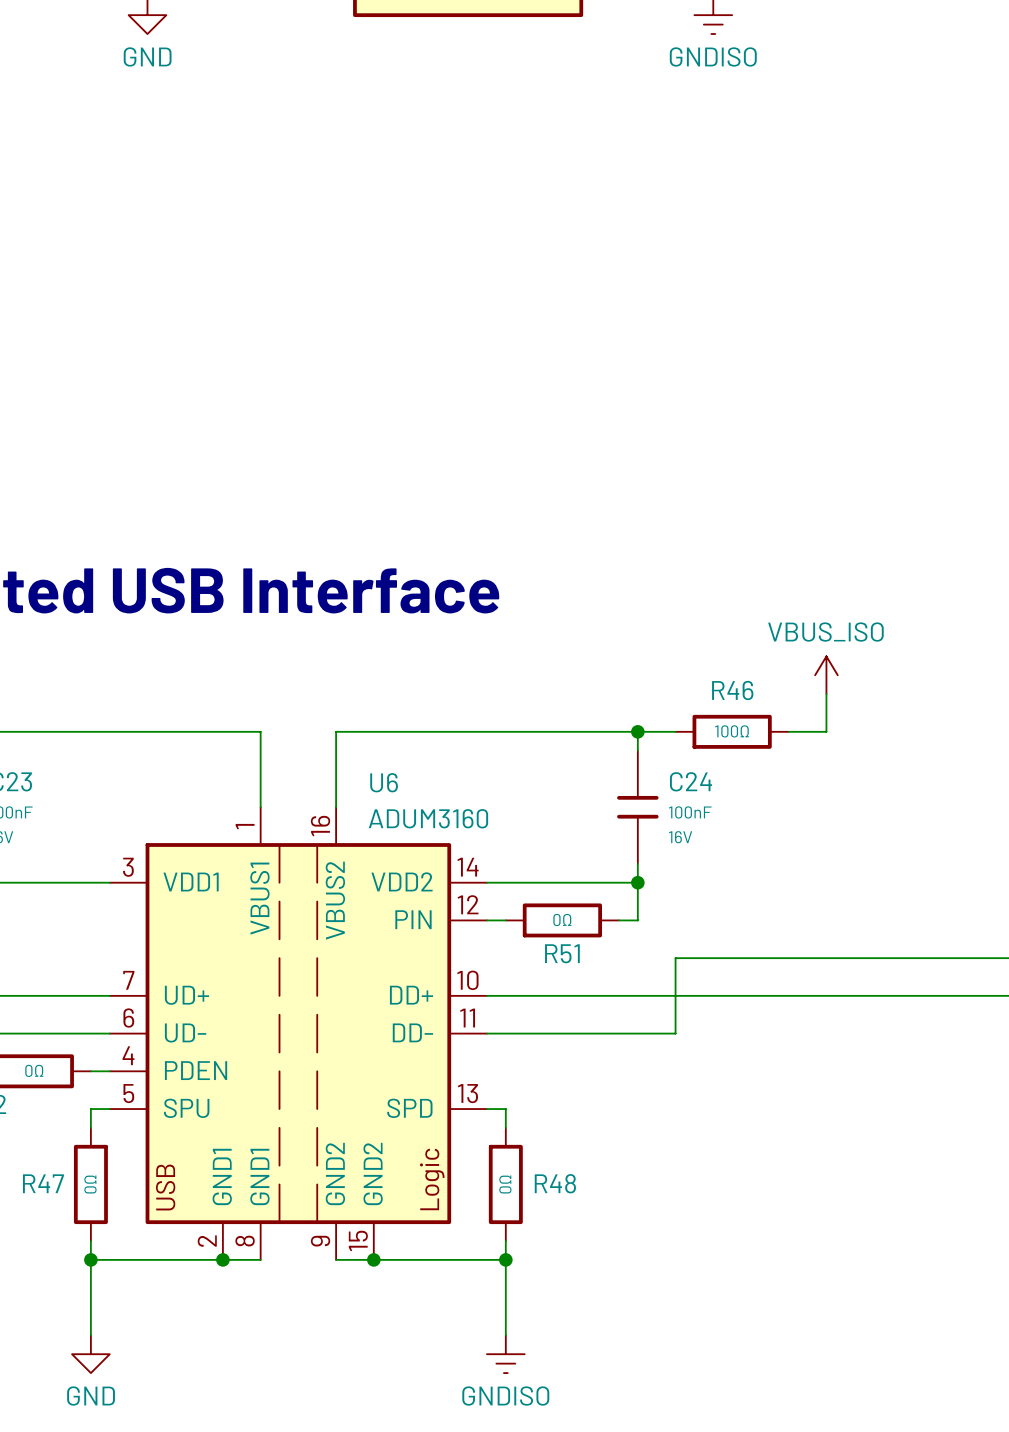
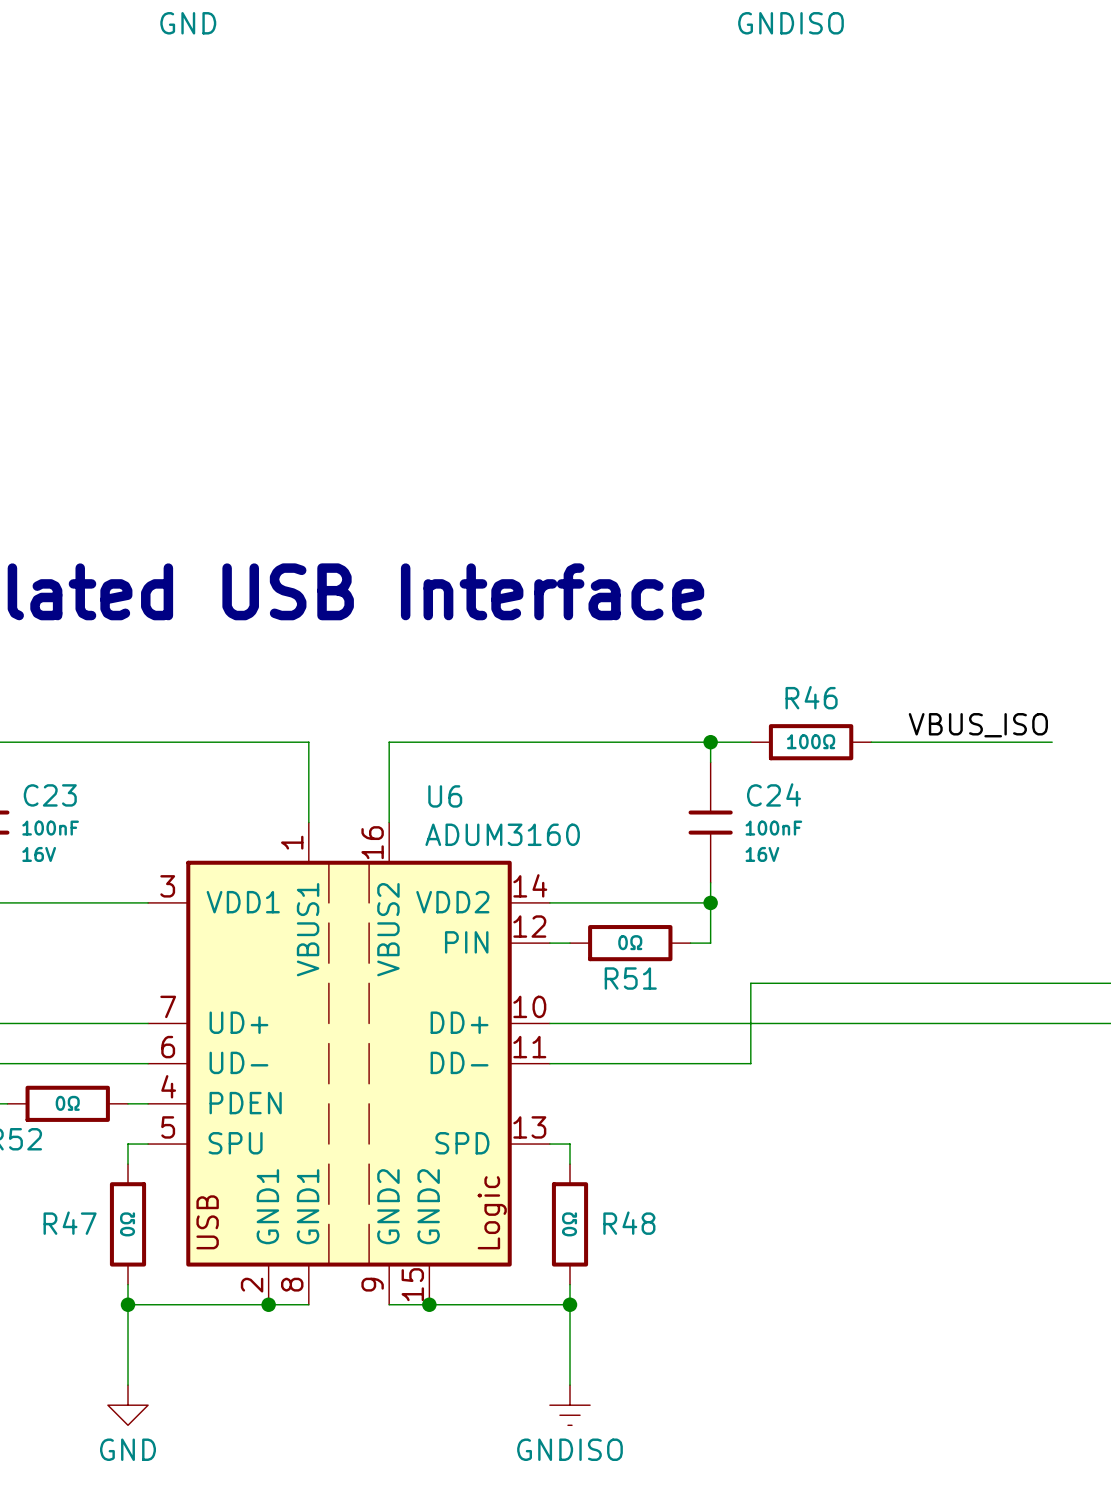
power symbol: VBUS_ISO (826, 675) -> none
wire: (826, 694) (826, 731) -> (1052, 742) (911, 742)
label: none -> VBUS_ISO (978, 725)

